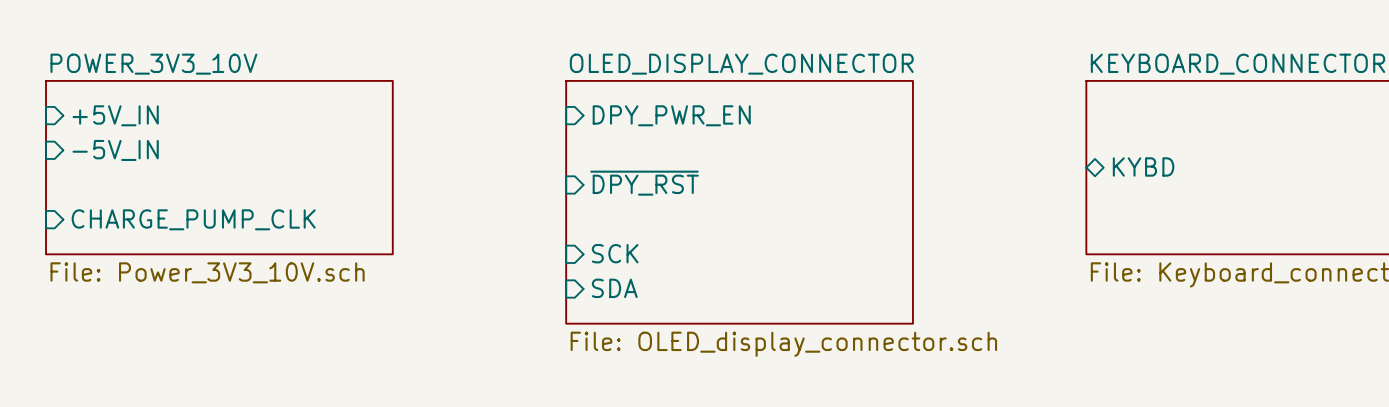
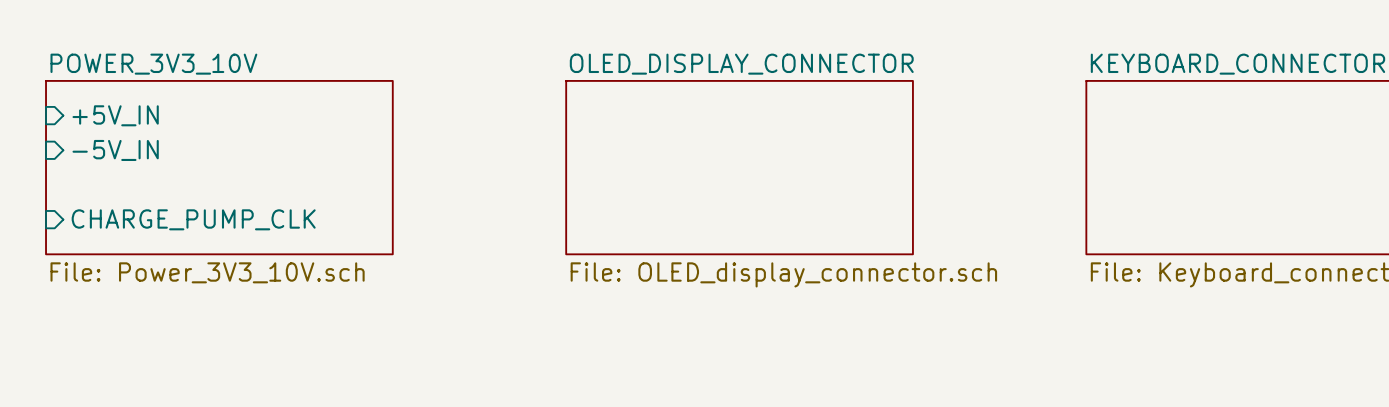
sheet pin: DPY_PWR_EN (671, 115) -> none
sheet pin: KYBD (1143, 166) -> none
sheet OLED_DISPLAY_CONNECTOR: none -> File: OLED_display_connector.sch (739, 167)
sheet pin: ~{DPY_RST} (644, 183) -> none
sheet OLED_DISPLAY_CONNECTOR: File: OLED_display_connector.sch (739, 202) -> none
sheet pin: SCK (615, 253) -> none
sheet pin: SDA (614, 288) -> none

